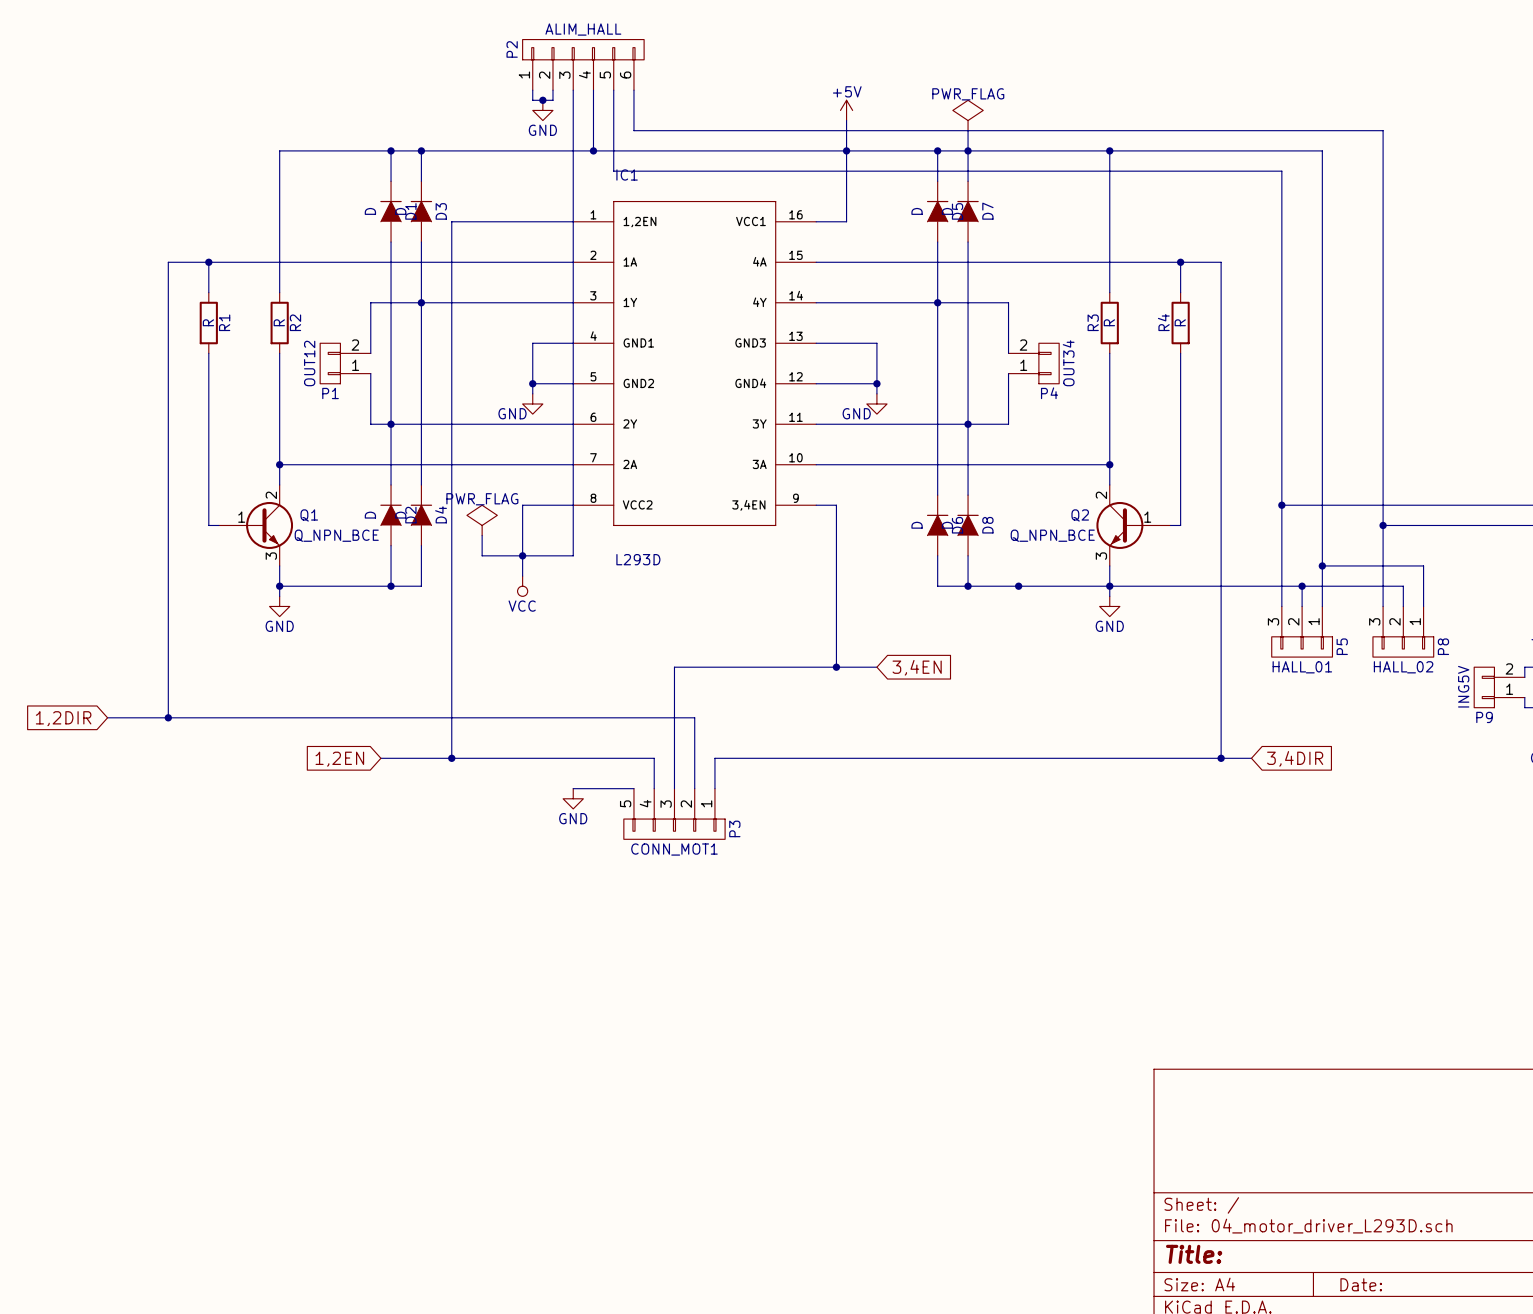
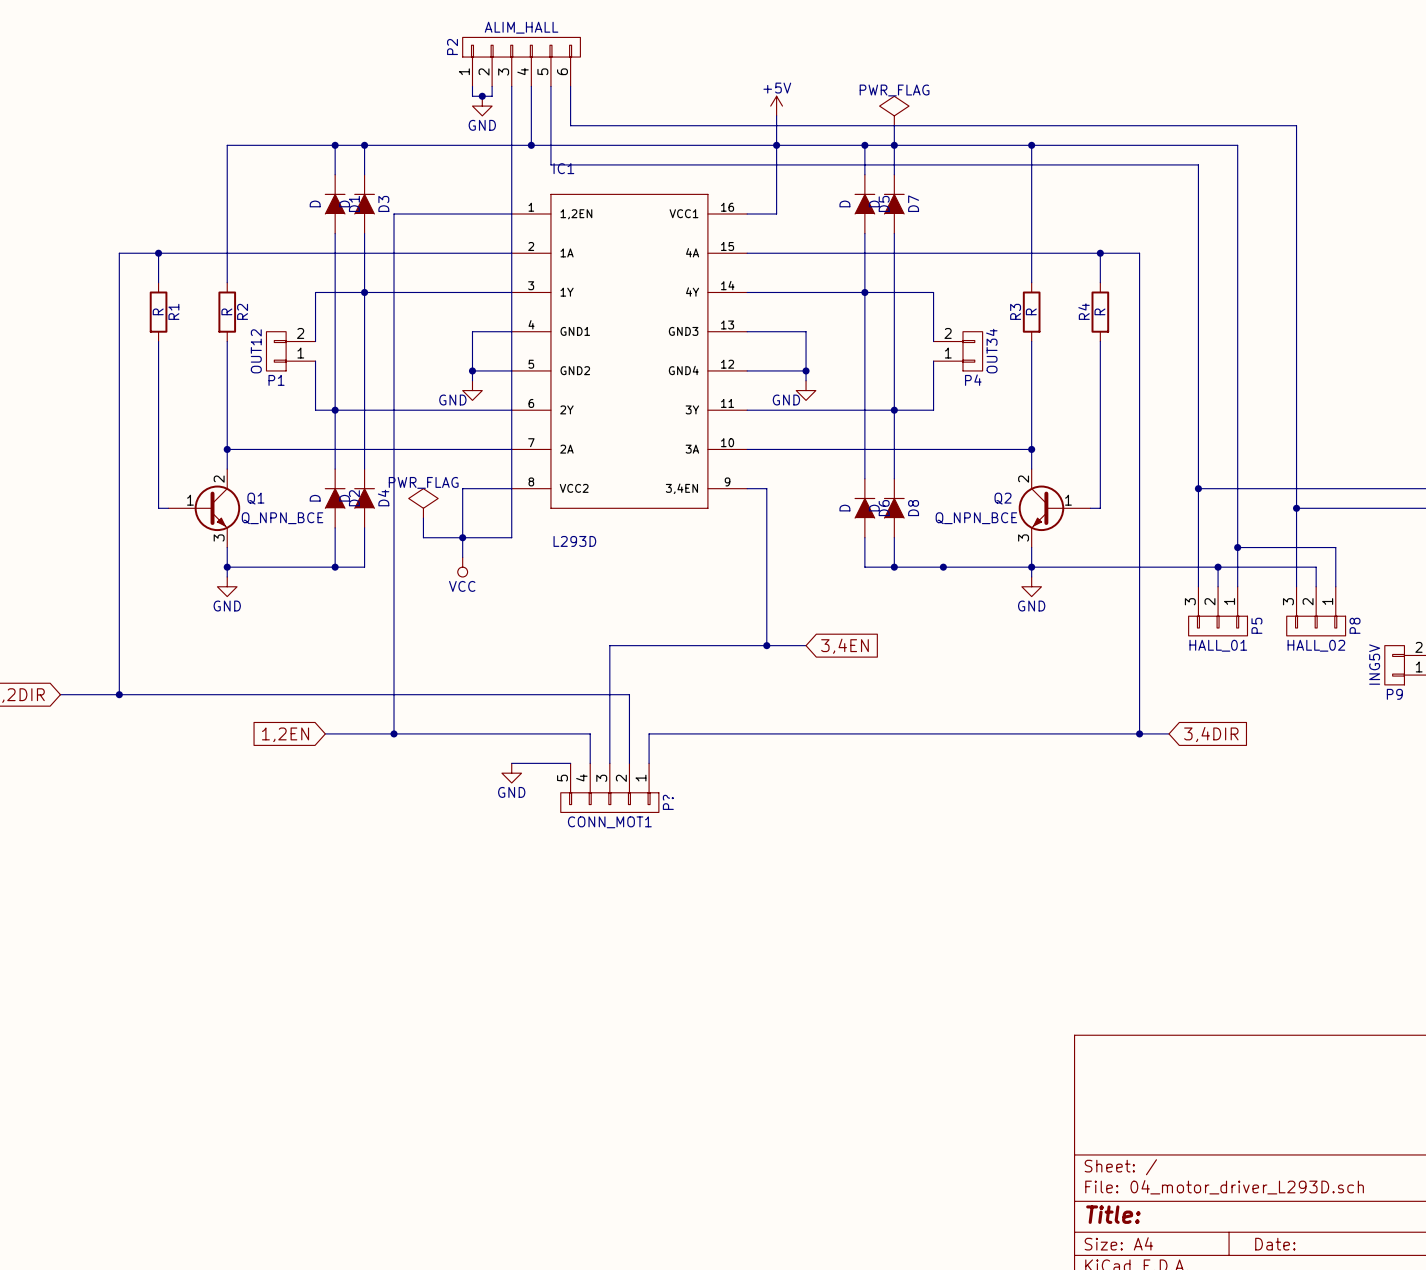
P3 name: P3 (734, 828) -> P? (668, 802)

